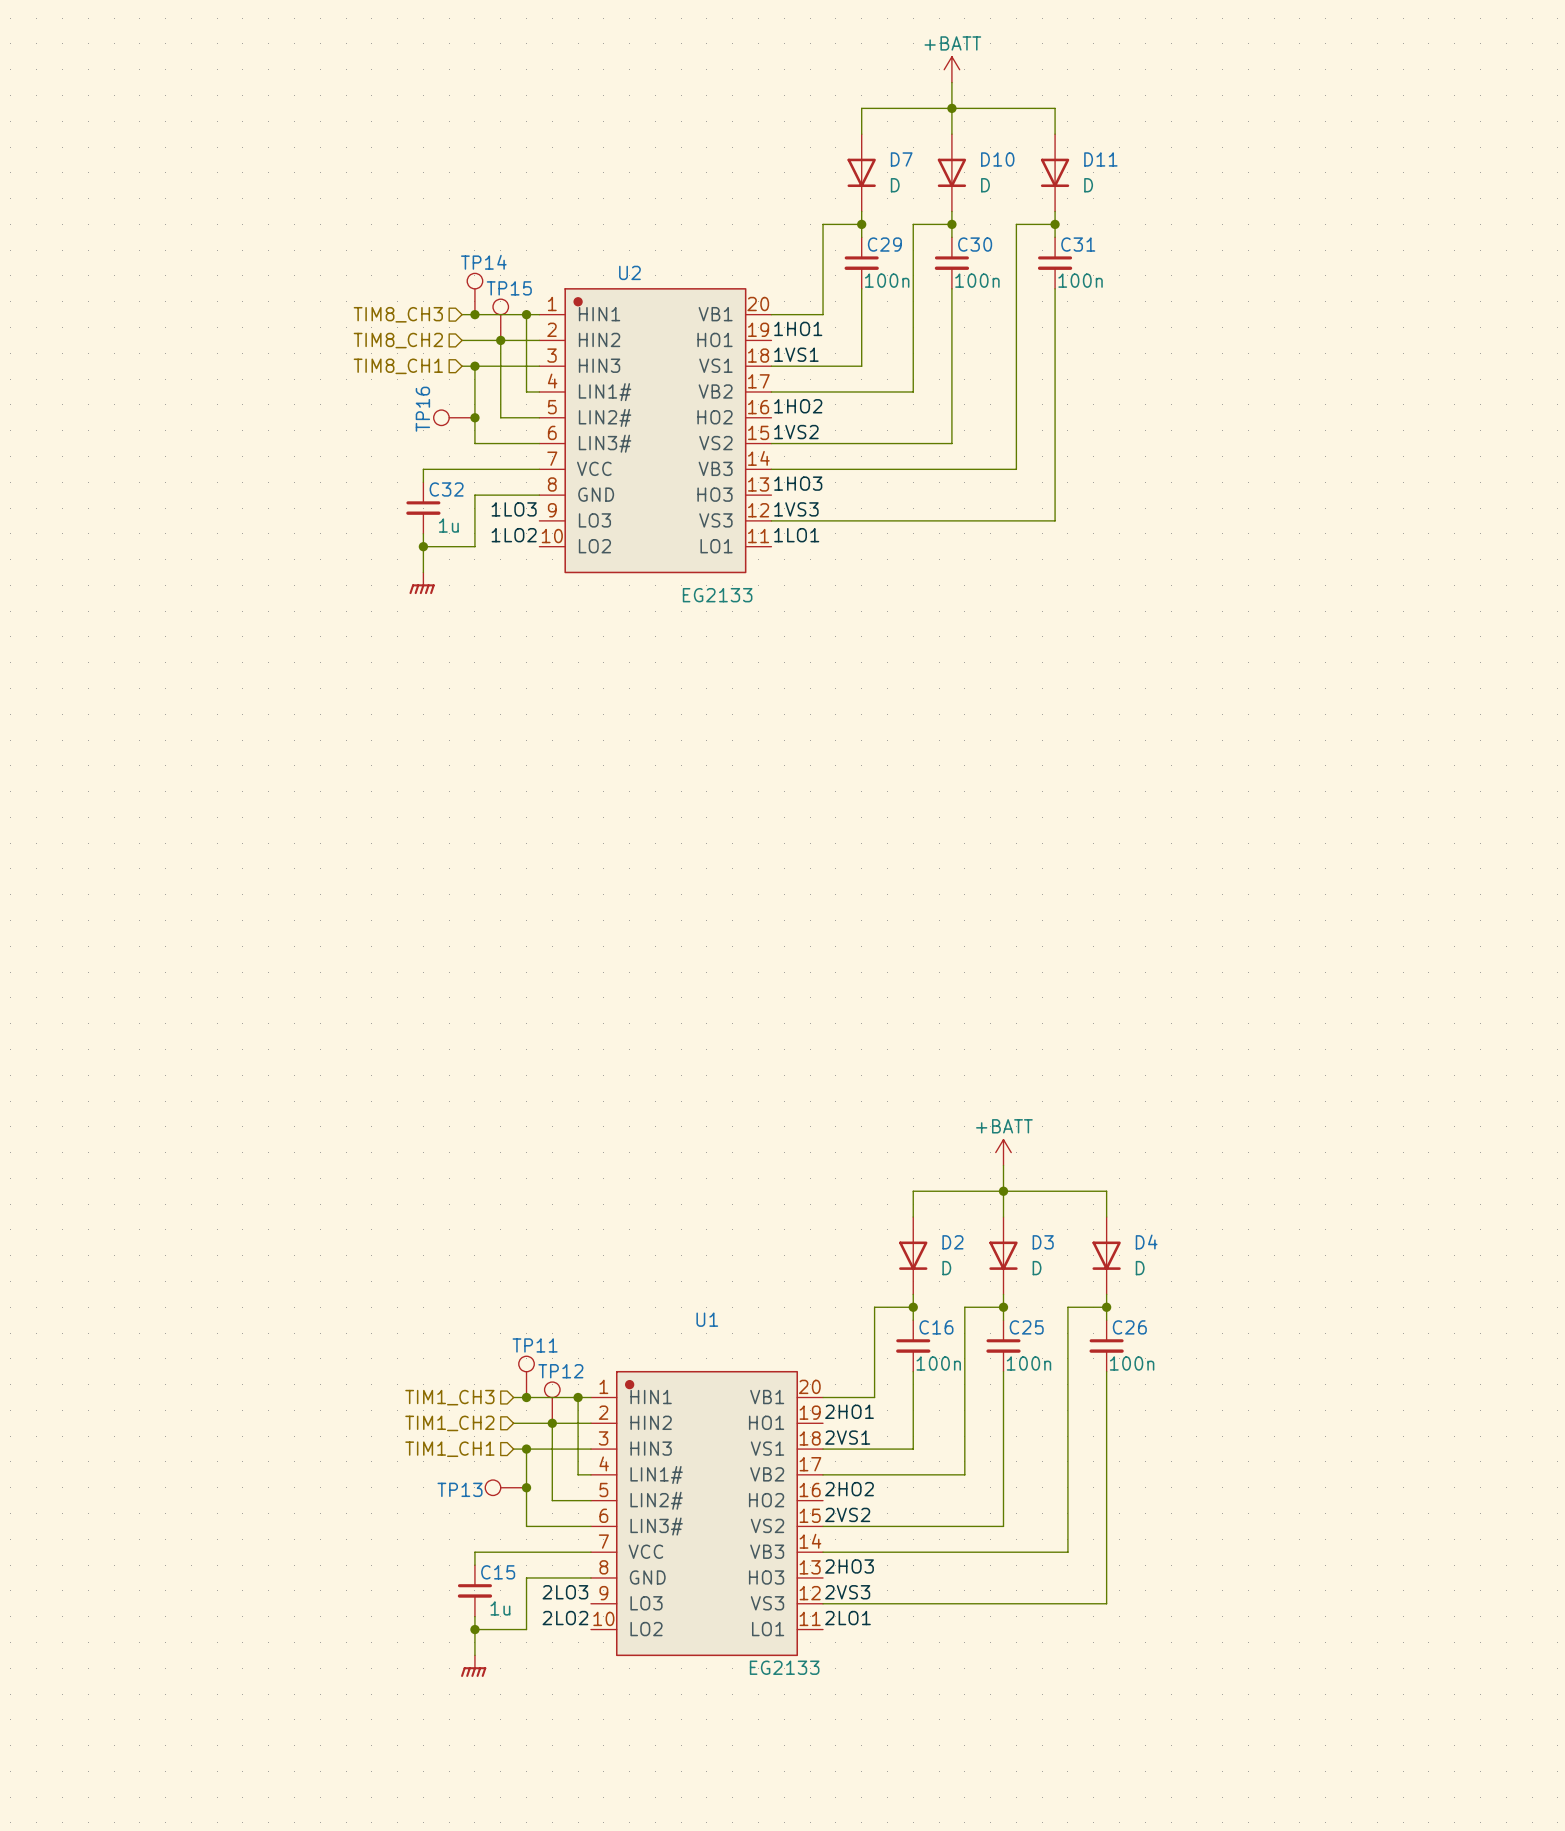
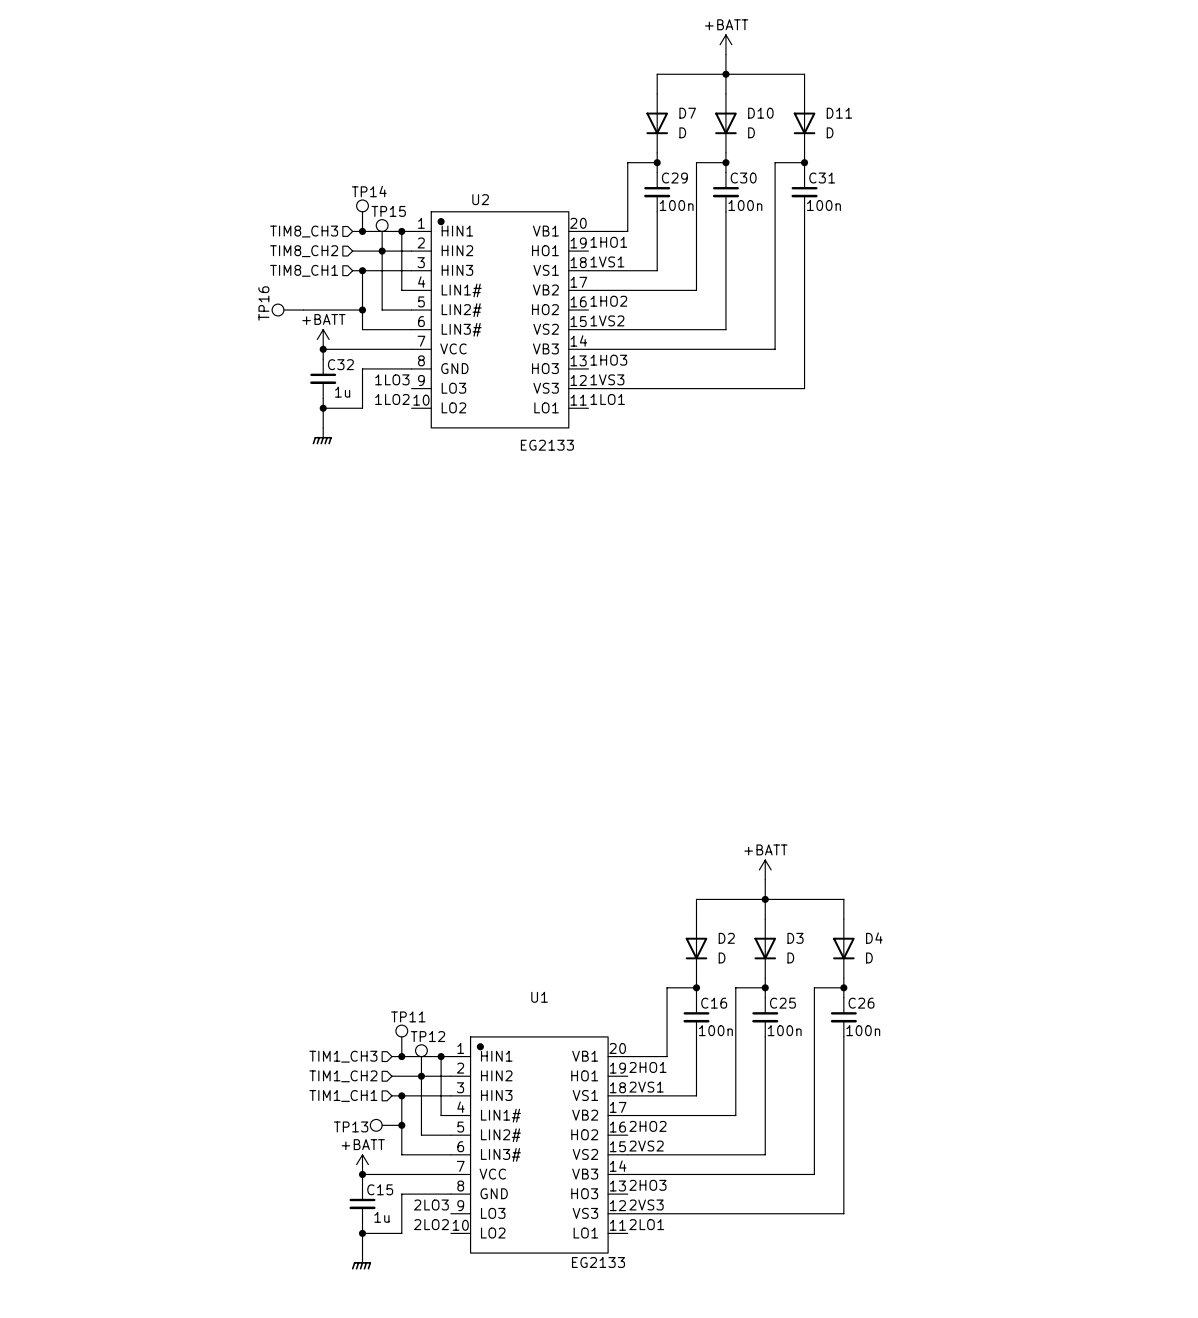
wire: none -> (303, 310) (362, 310)
TP16 position: (454, 417) -> (287, 310)
power symbol: none -> +BATT (323, 339)
junction: none -> (323, 349)
power symbol: none -> +BATT (362, 1164)
junction: none -> (362, 1174)

